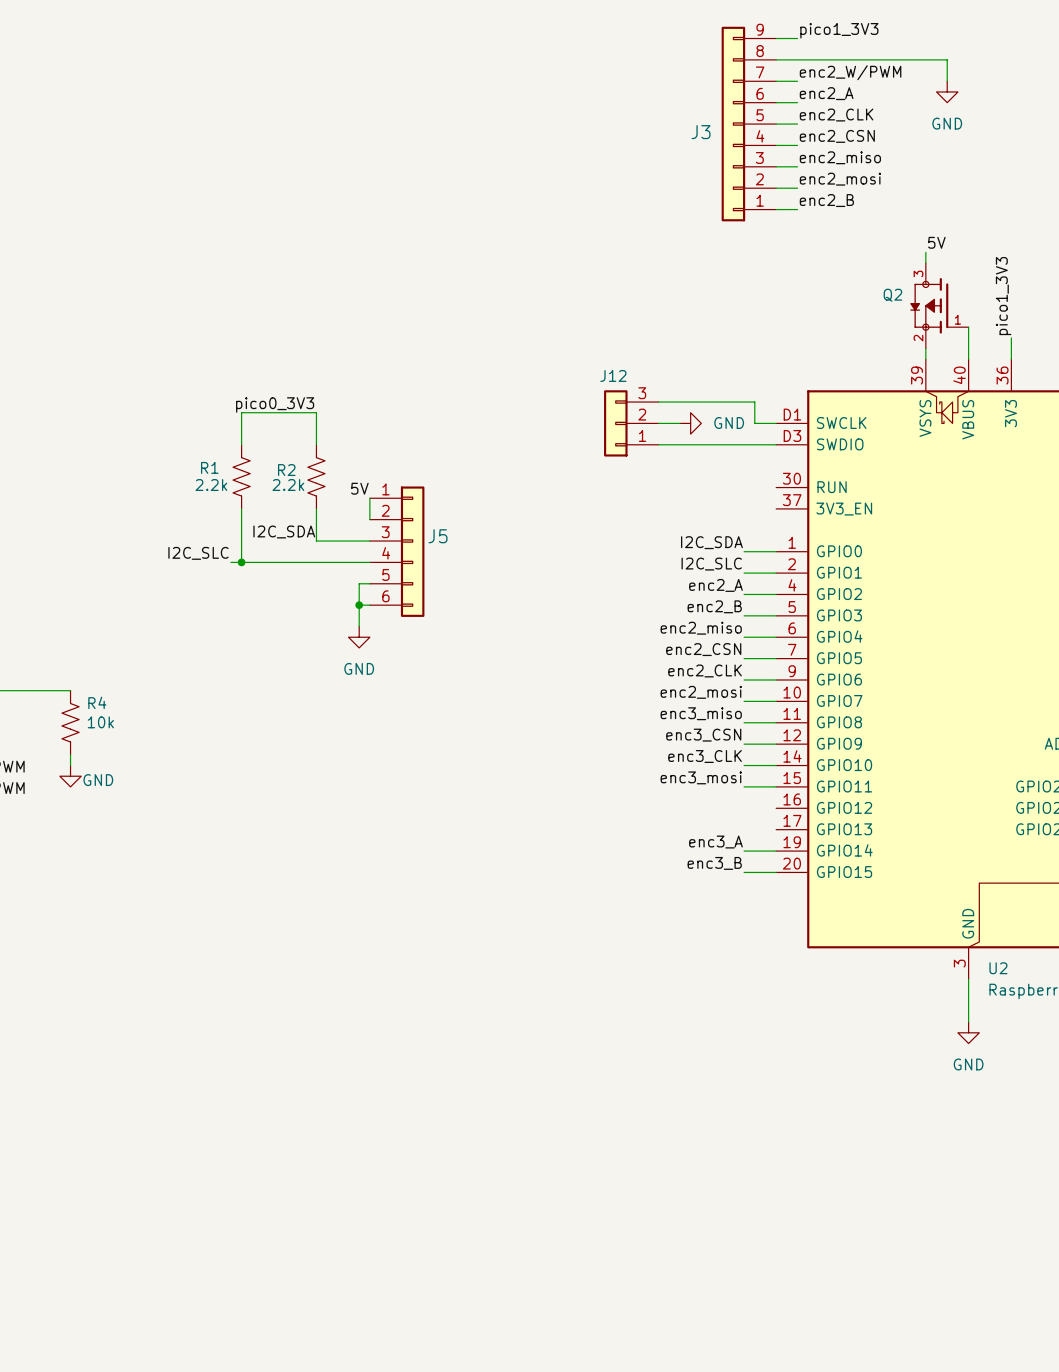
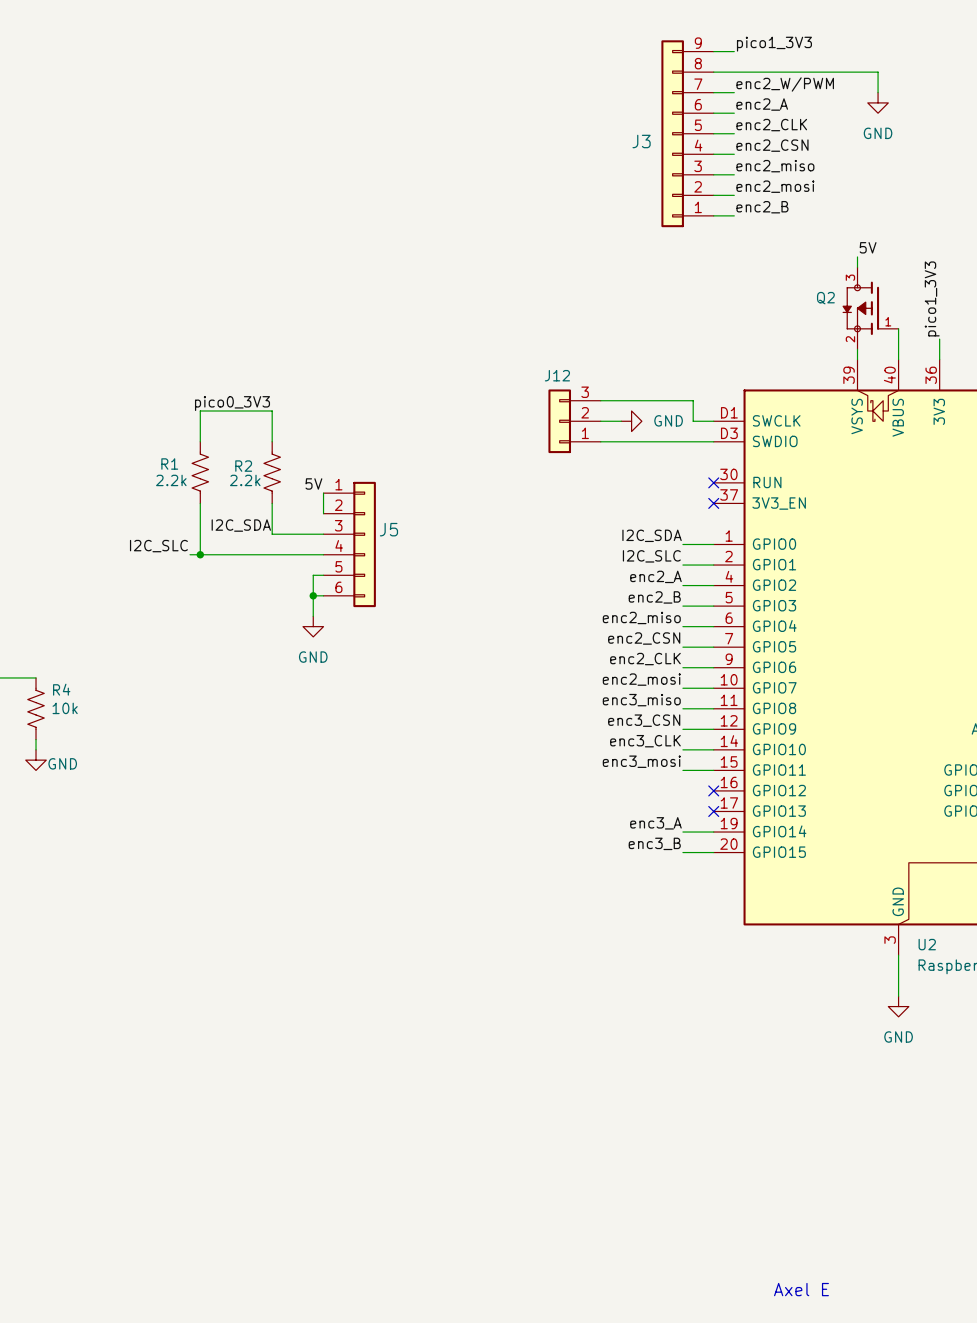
no-connect mark: none -> (713, 482)
no-connect mark: none -> (713, 503)
no-connect mark: none -> (713, 790)
no-connect mark: none -> (713, 811)
text: none -> Axel E (801, 1289)

